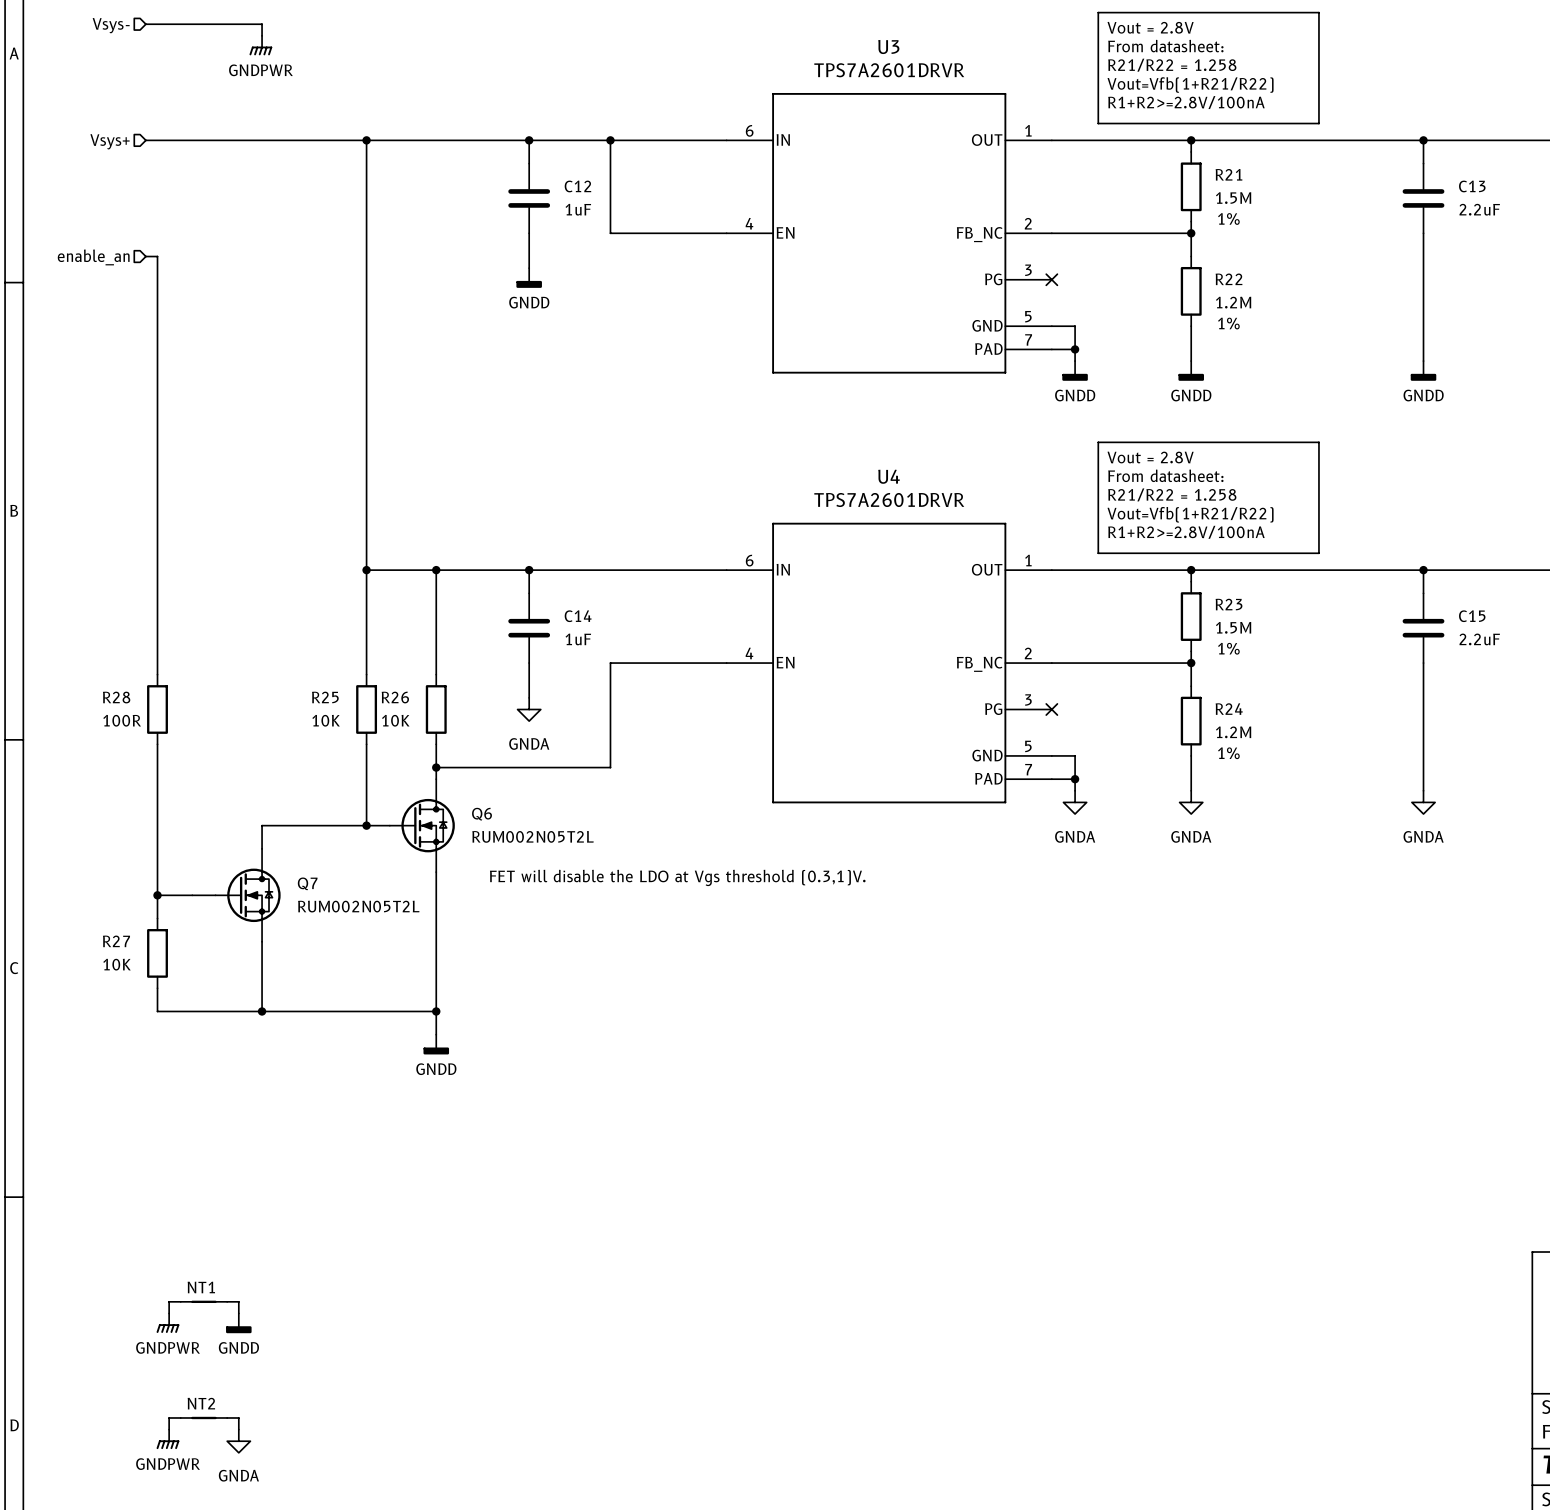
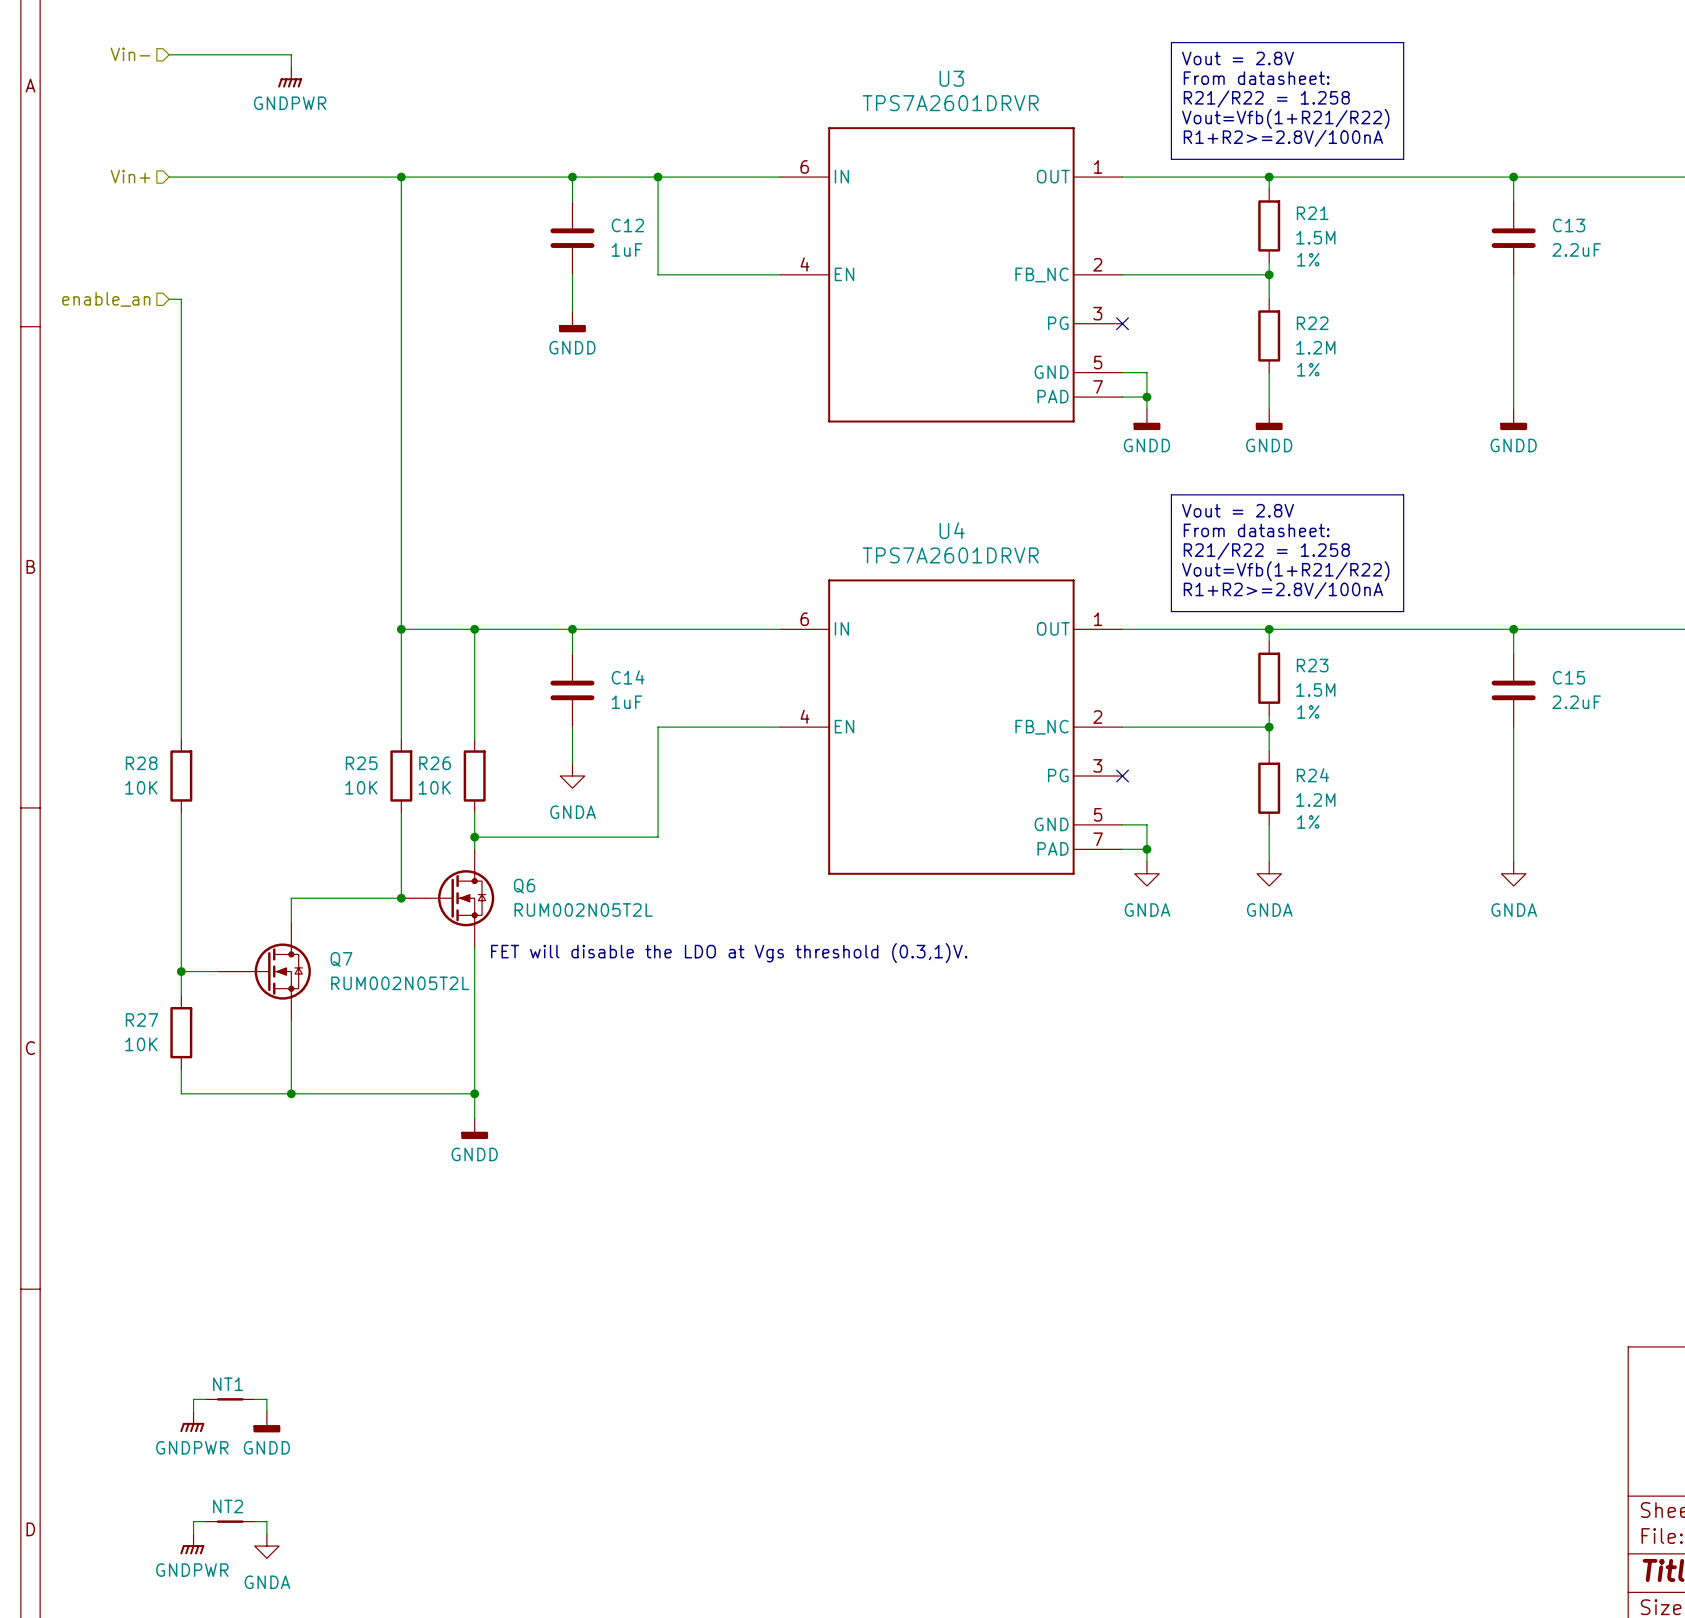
hierarchical label: Vsys- (111, 25) -> Vin- (130, 54)
hierarchical label: Vsys+ (110, 141) -> Vin+ (130, 176)
R28 value: 100R (122, 720) -> 10K (141, 787)

